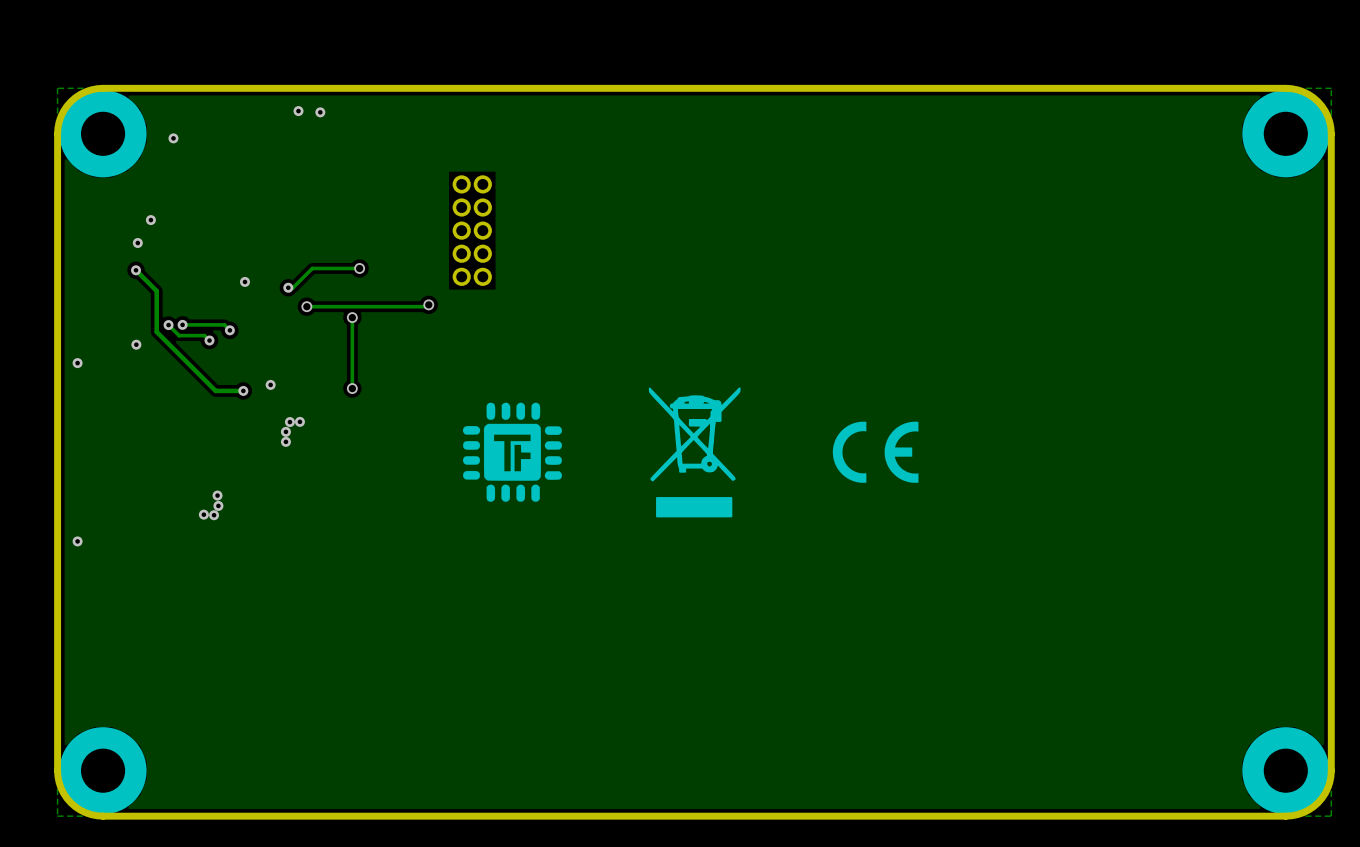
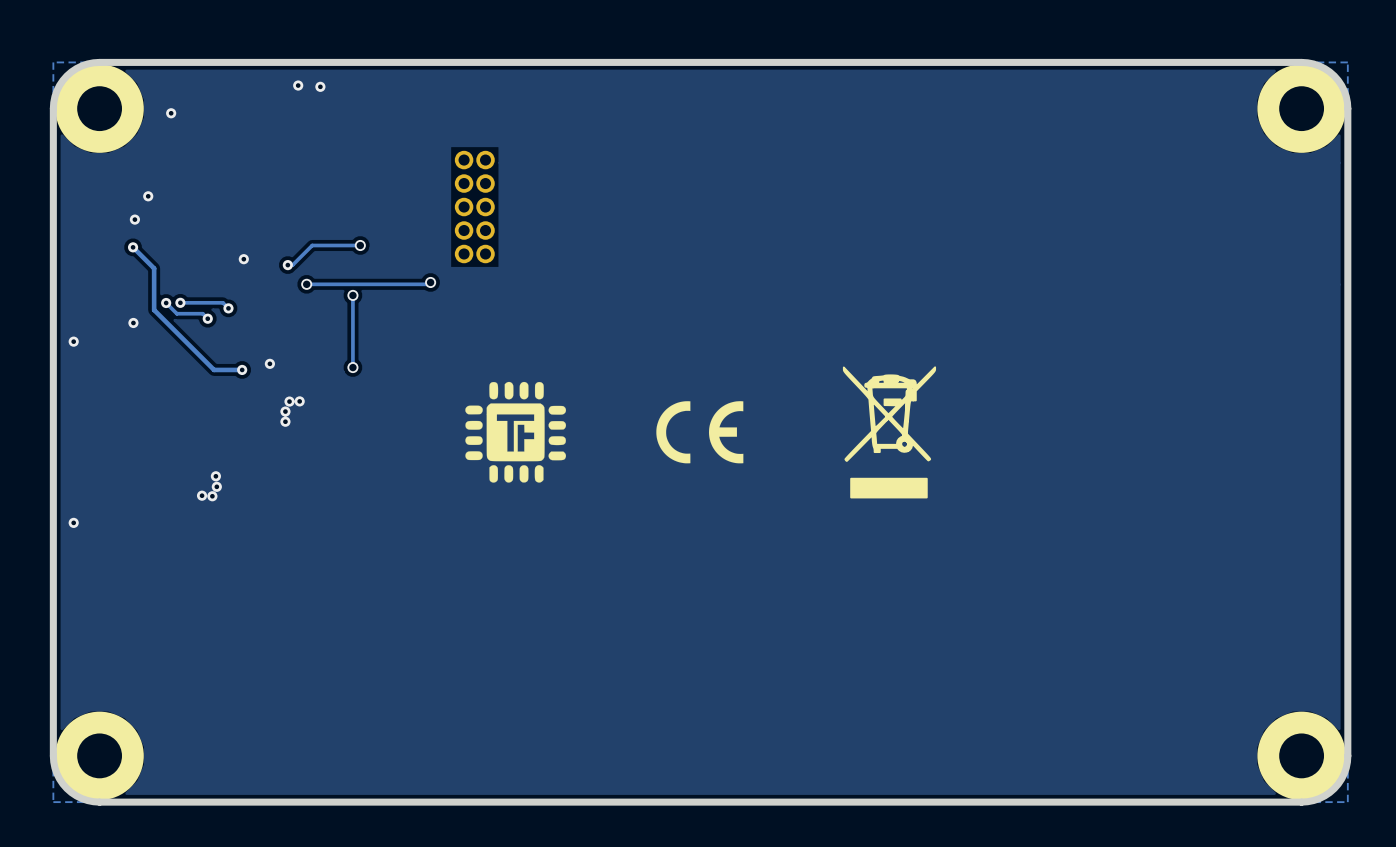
drawing position: (694, 452) -> (889, 432)
drawing position: (875, 452) -> (699, 432)

